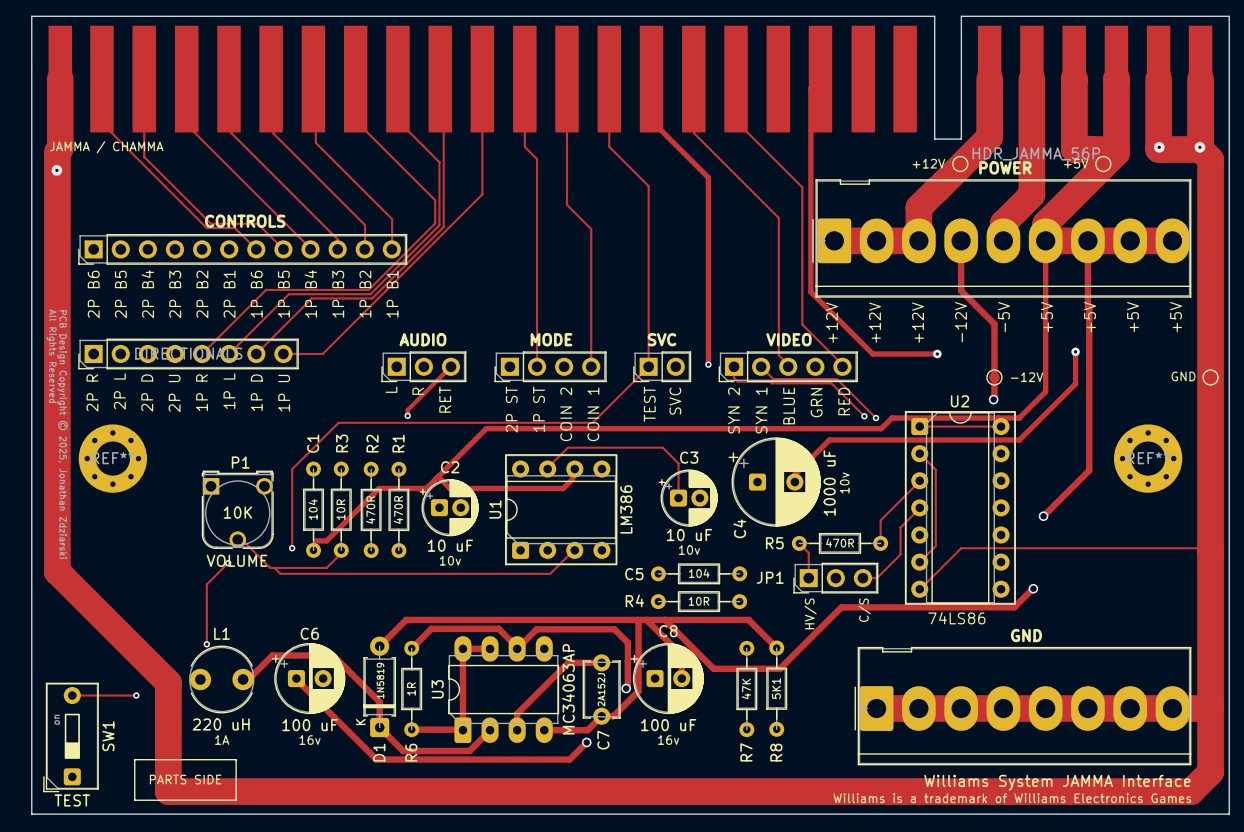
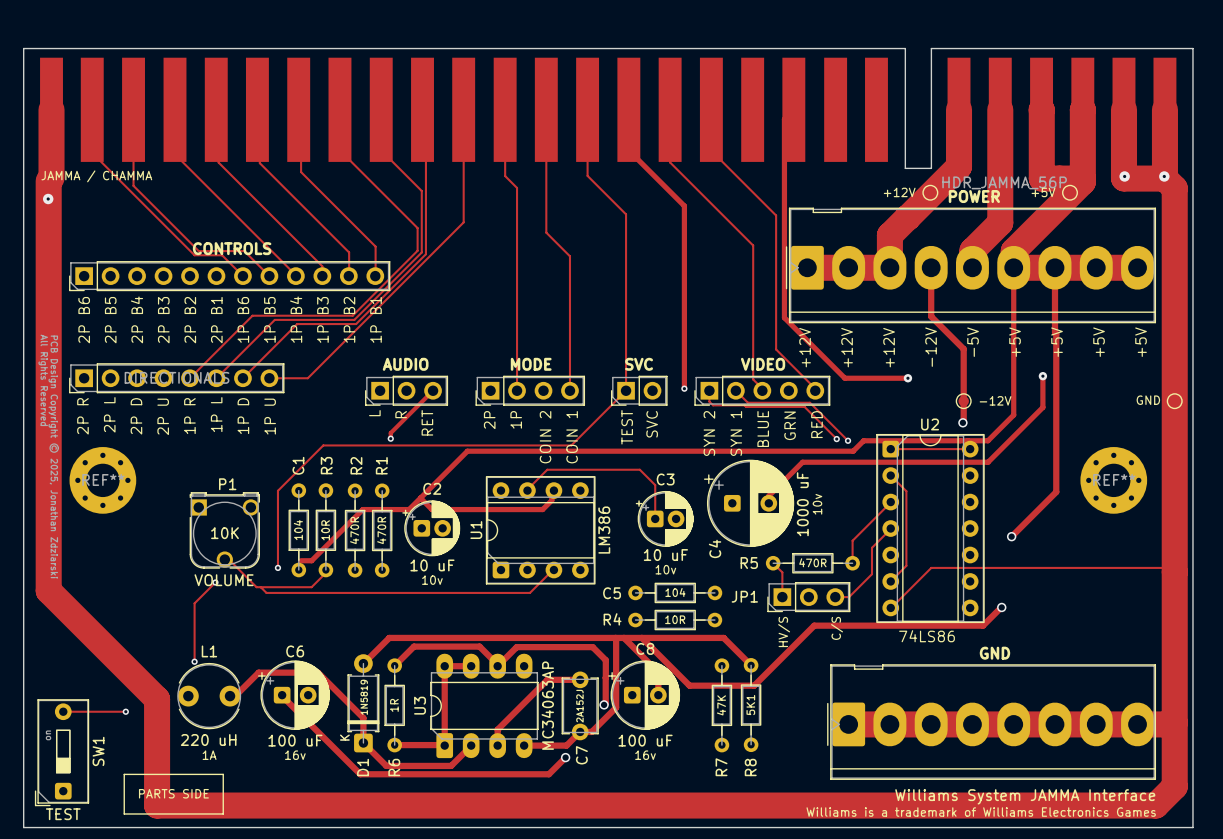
text: none -> 2P (489, 420)
text: none -> 1P (516, 419)
text: 2P ST (511, 409) -> none
text: 1P ST (538, 409) -> none

